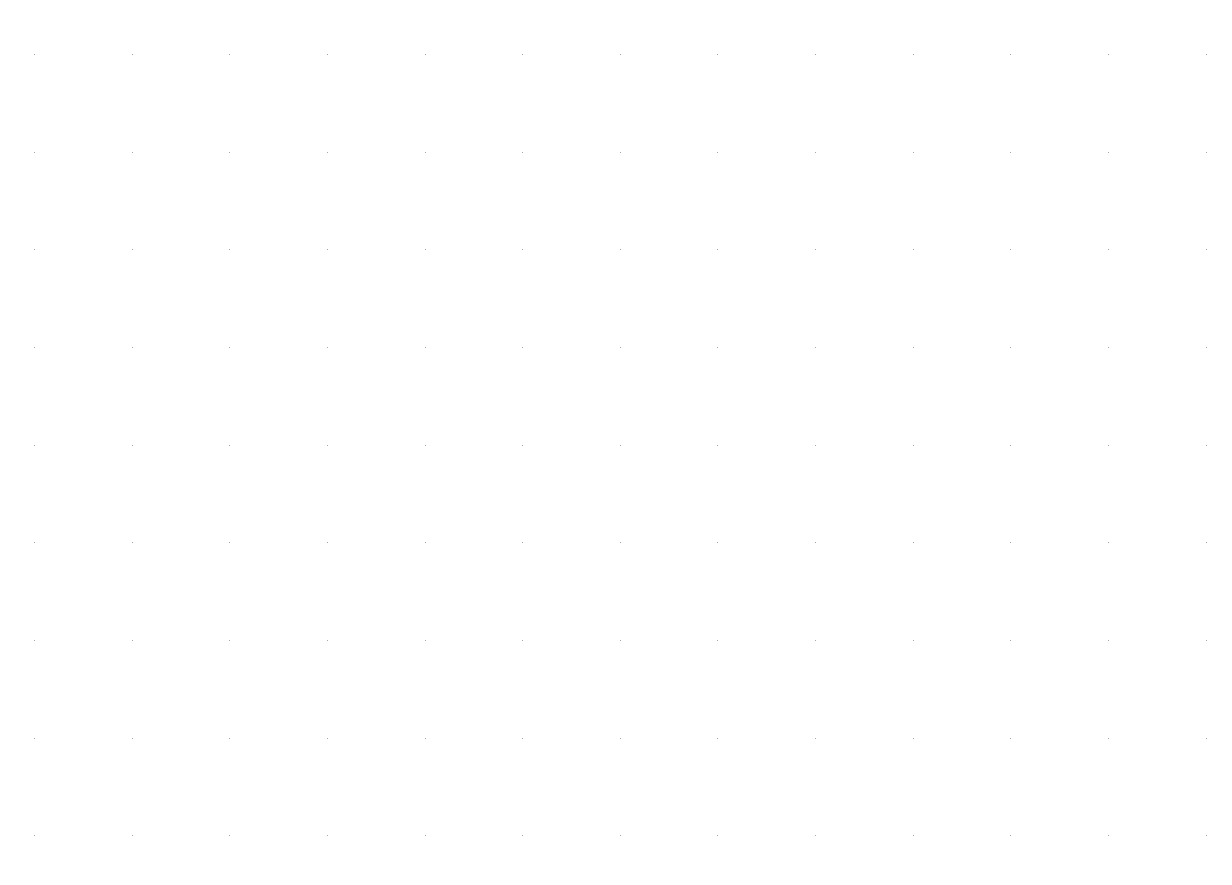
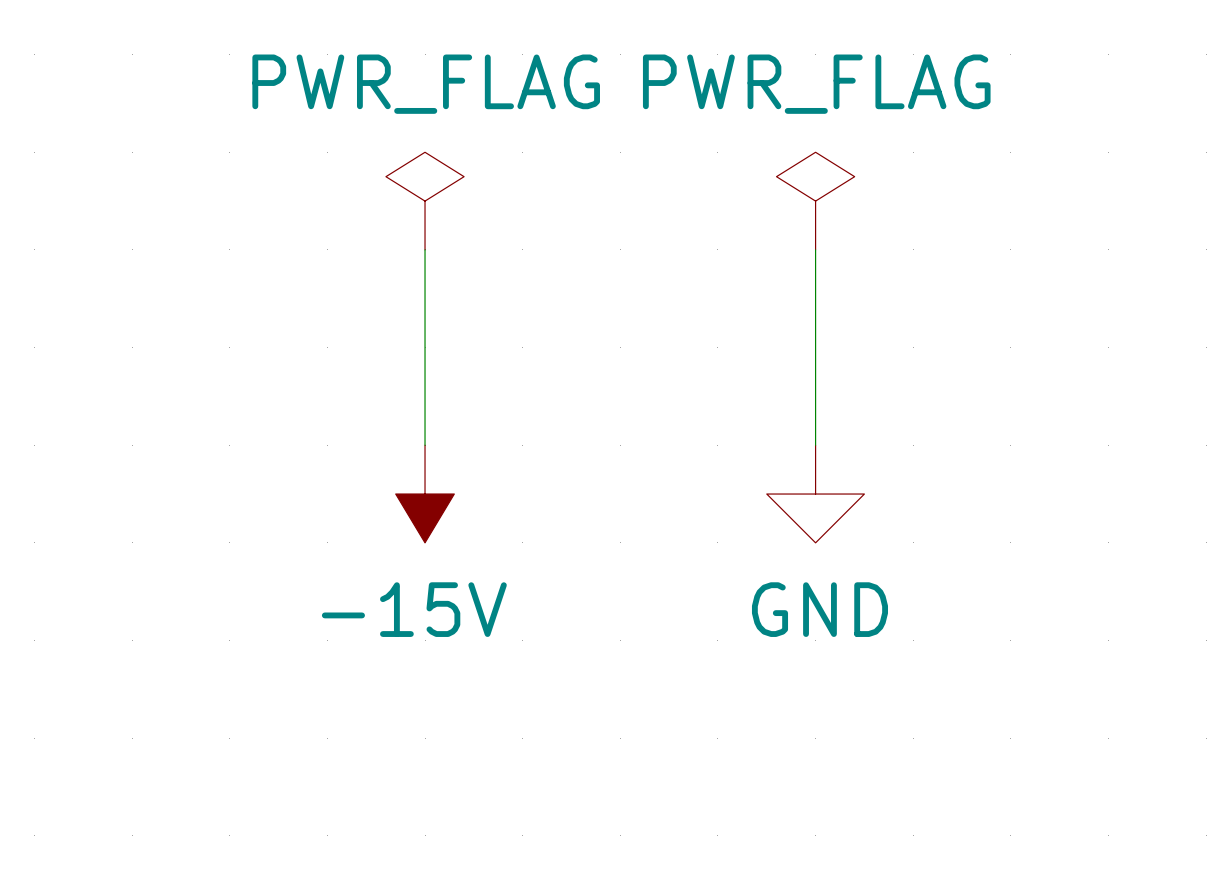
power symbol: none -> PWR_FLAG (425, 201)
power symbol: none -> PWR_FLAG (815, 201)
wire: none -> (425, 249) (425, 445)
wire: none -> (815, 249) (815, 445)
power symbol: none -> -15V (425, 494)
power symbol: none -> GND (815, 494)

